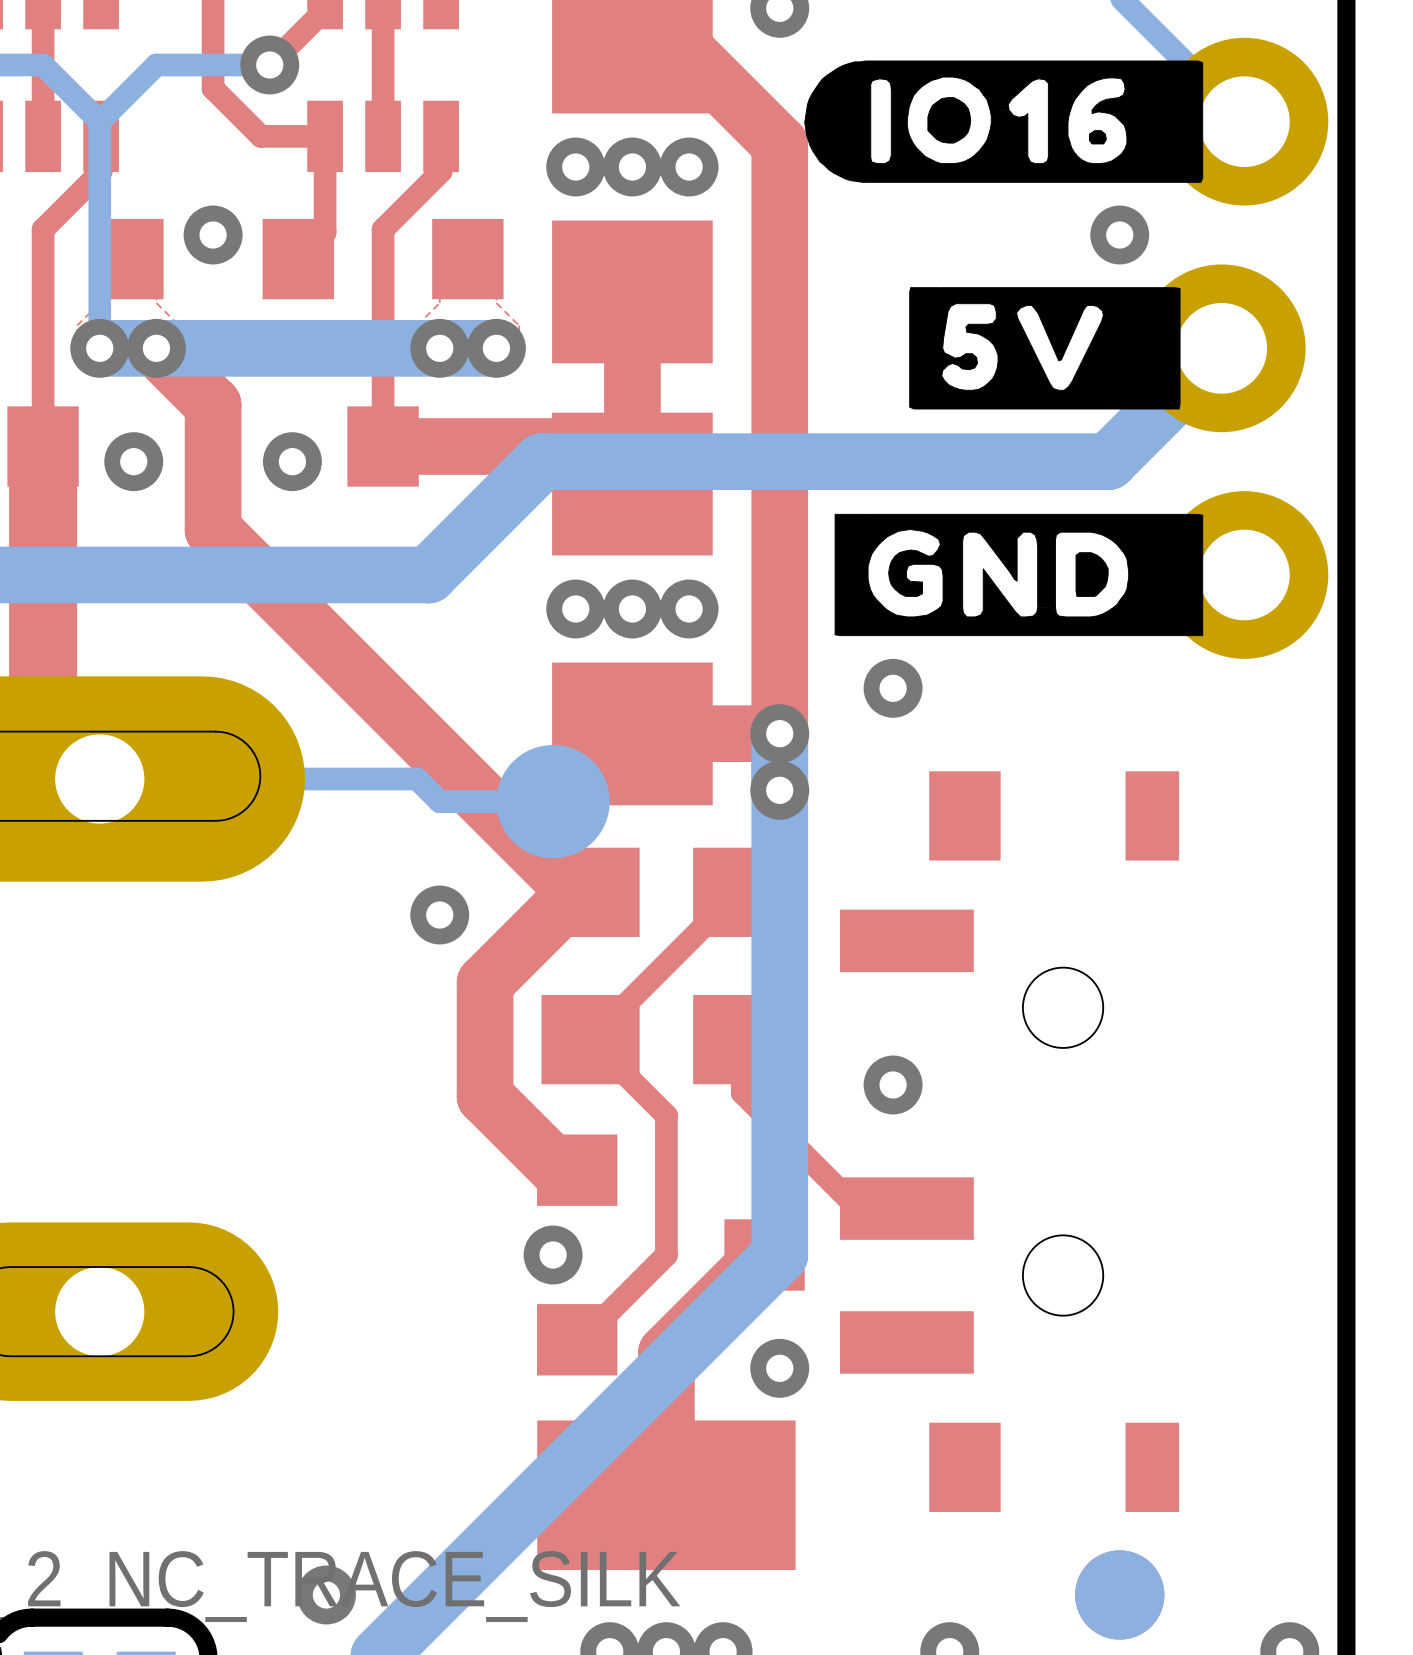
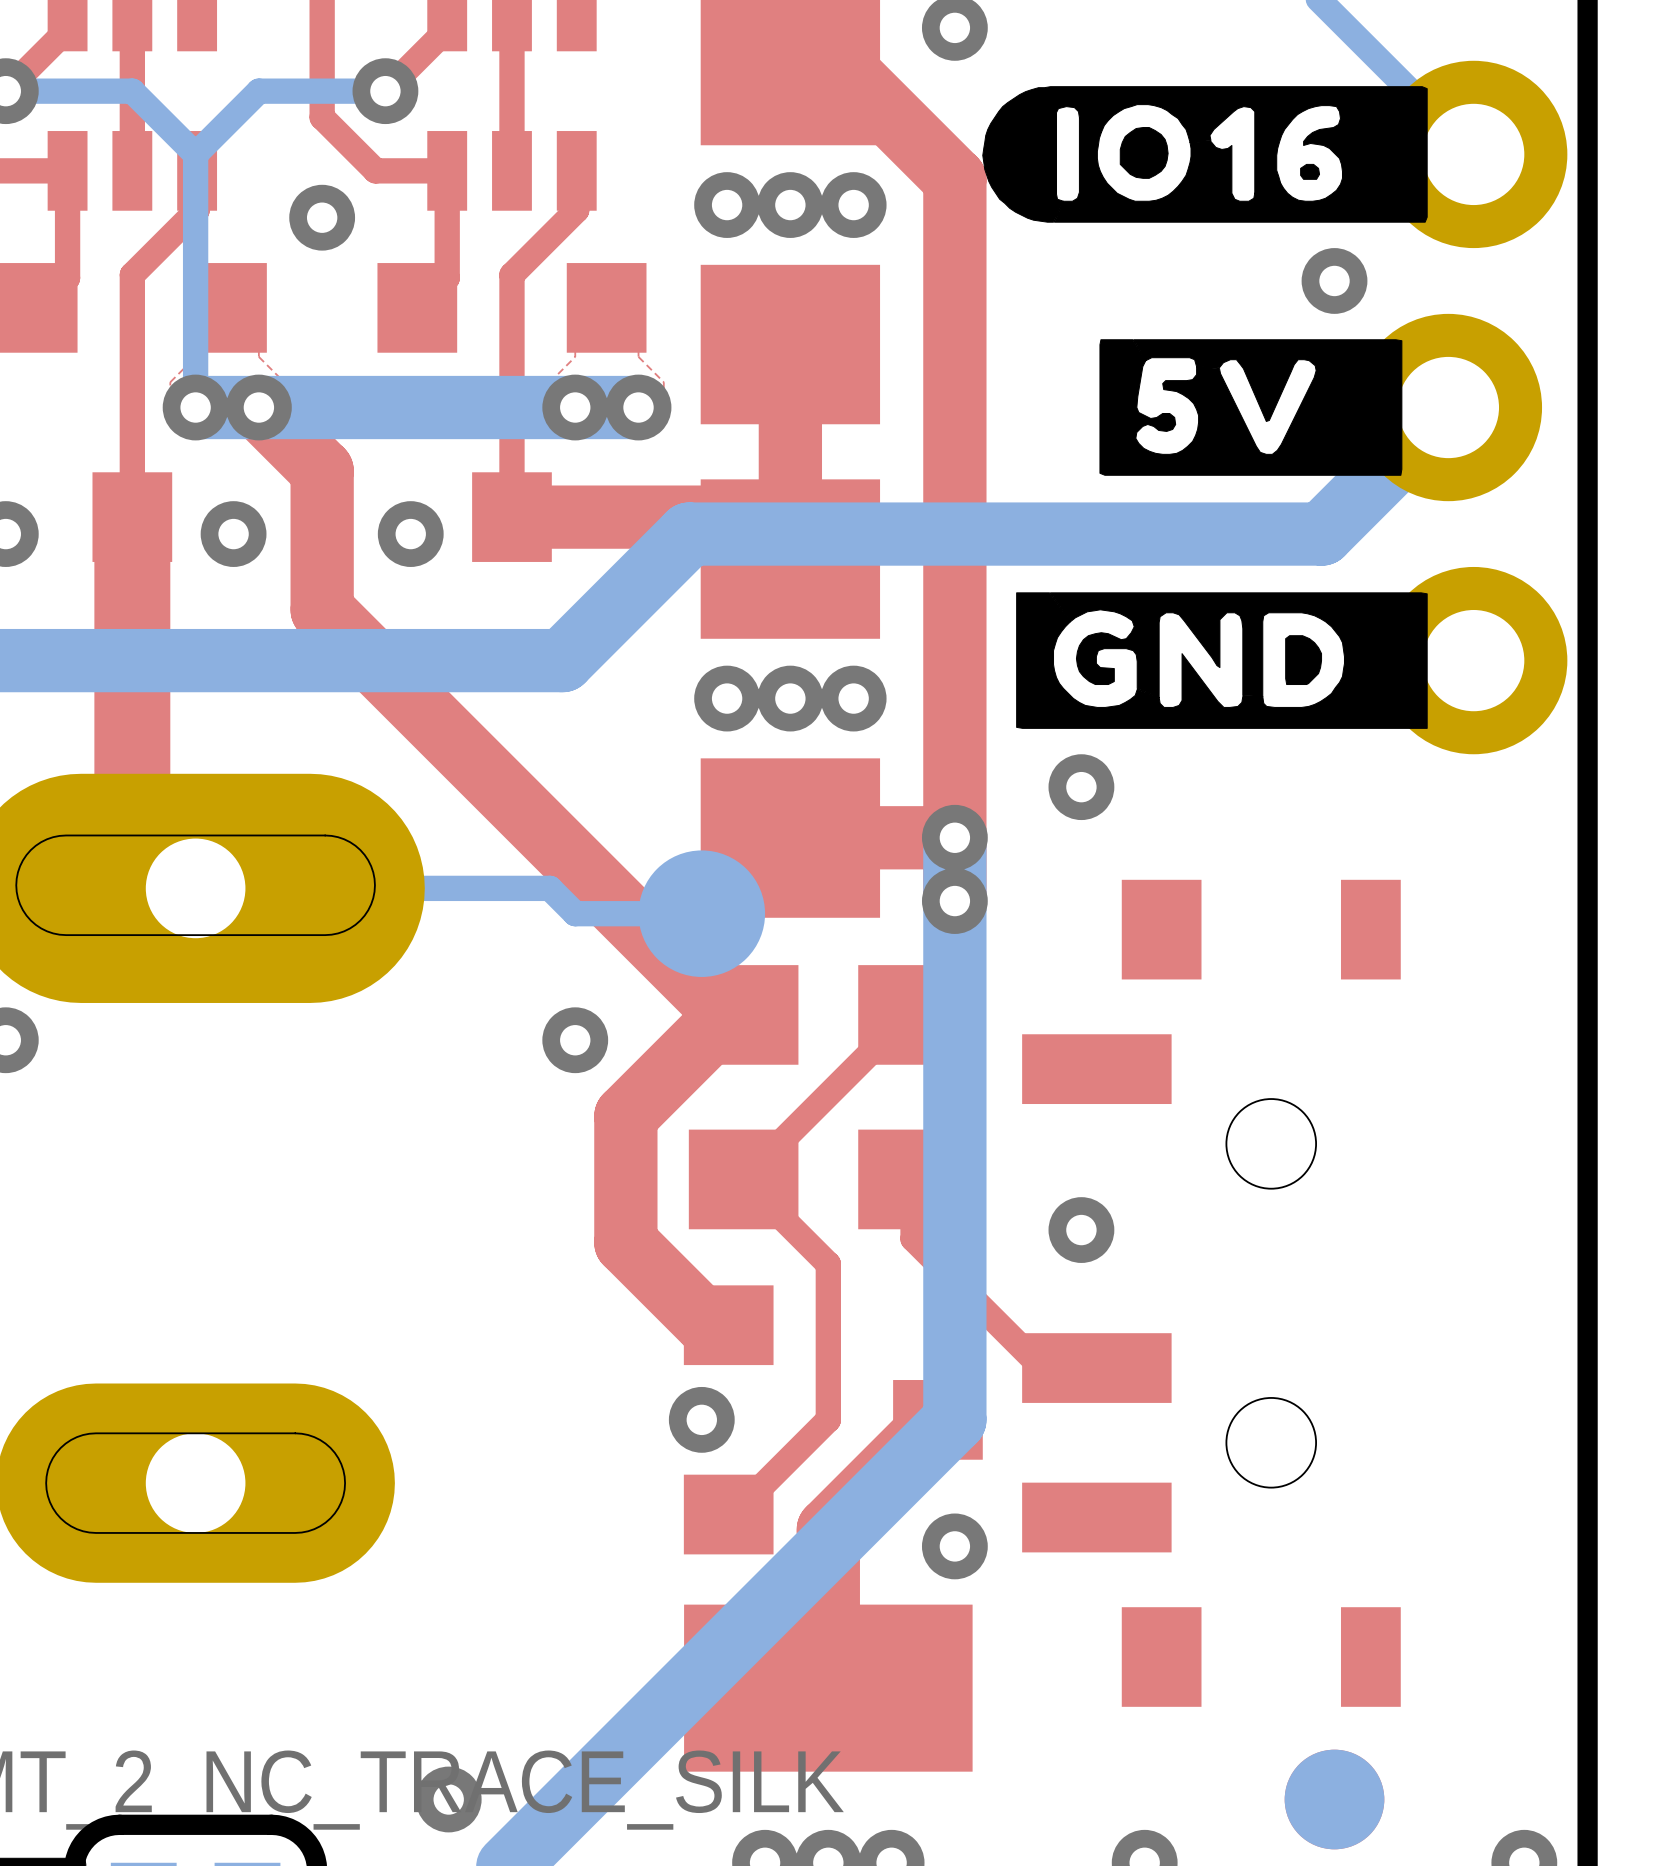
via position: (213, 235) -> (322, 217)

